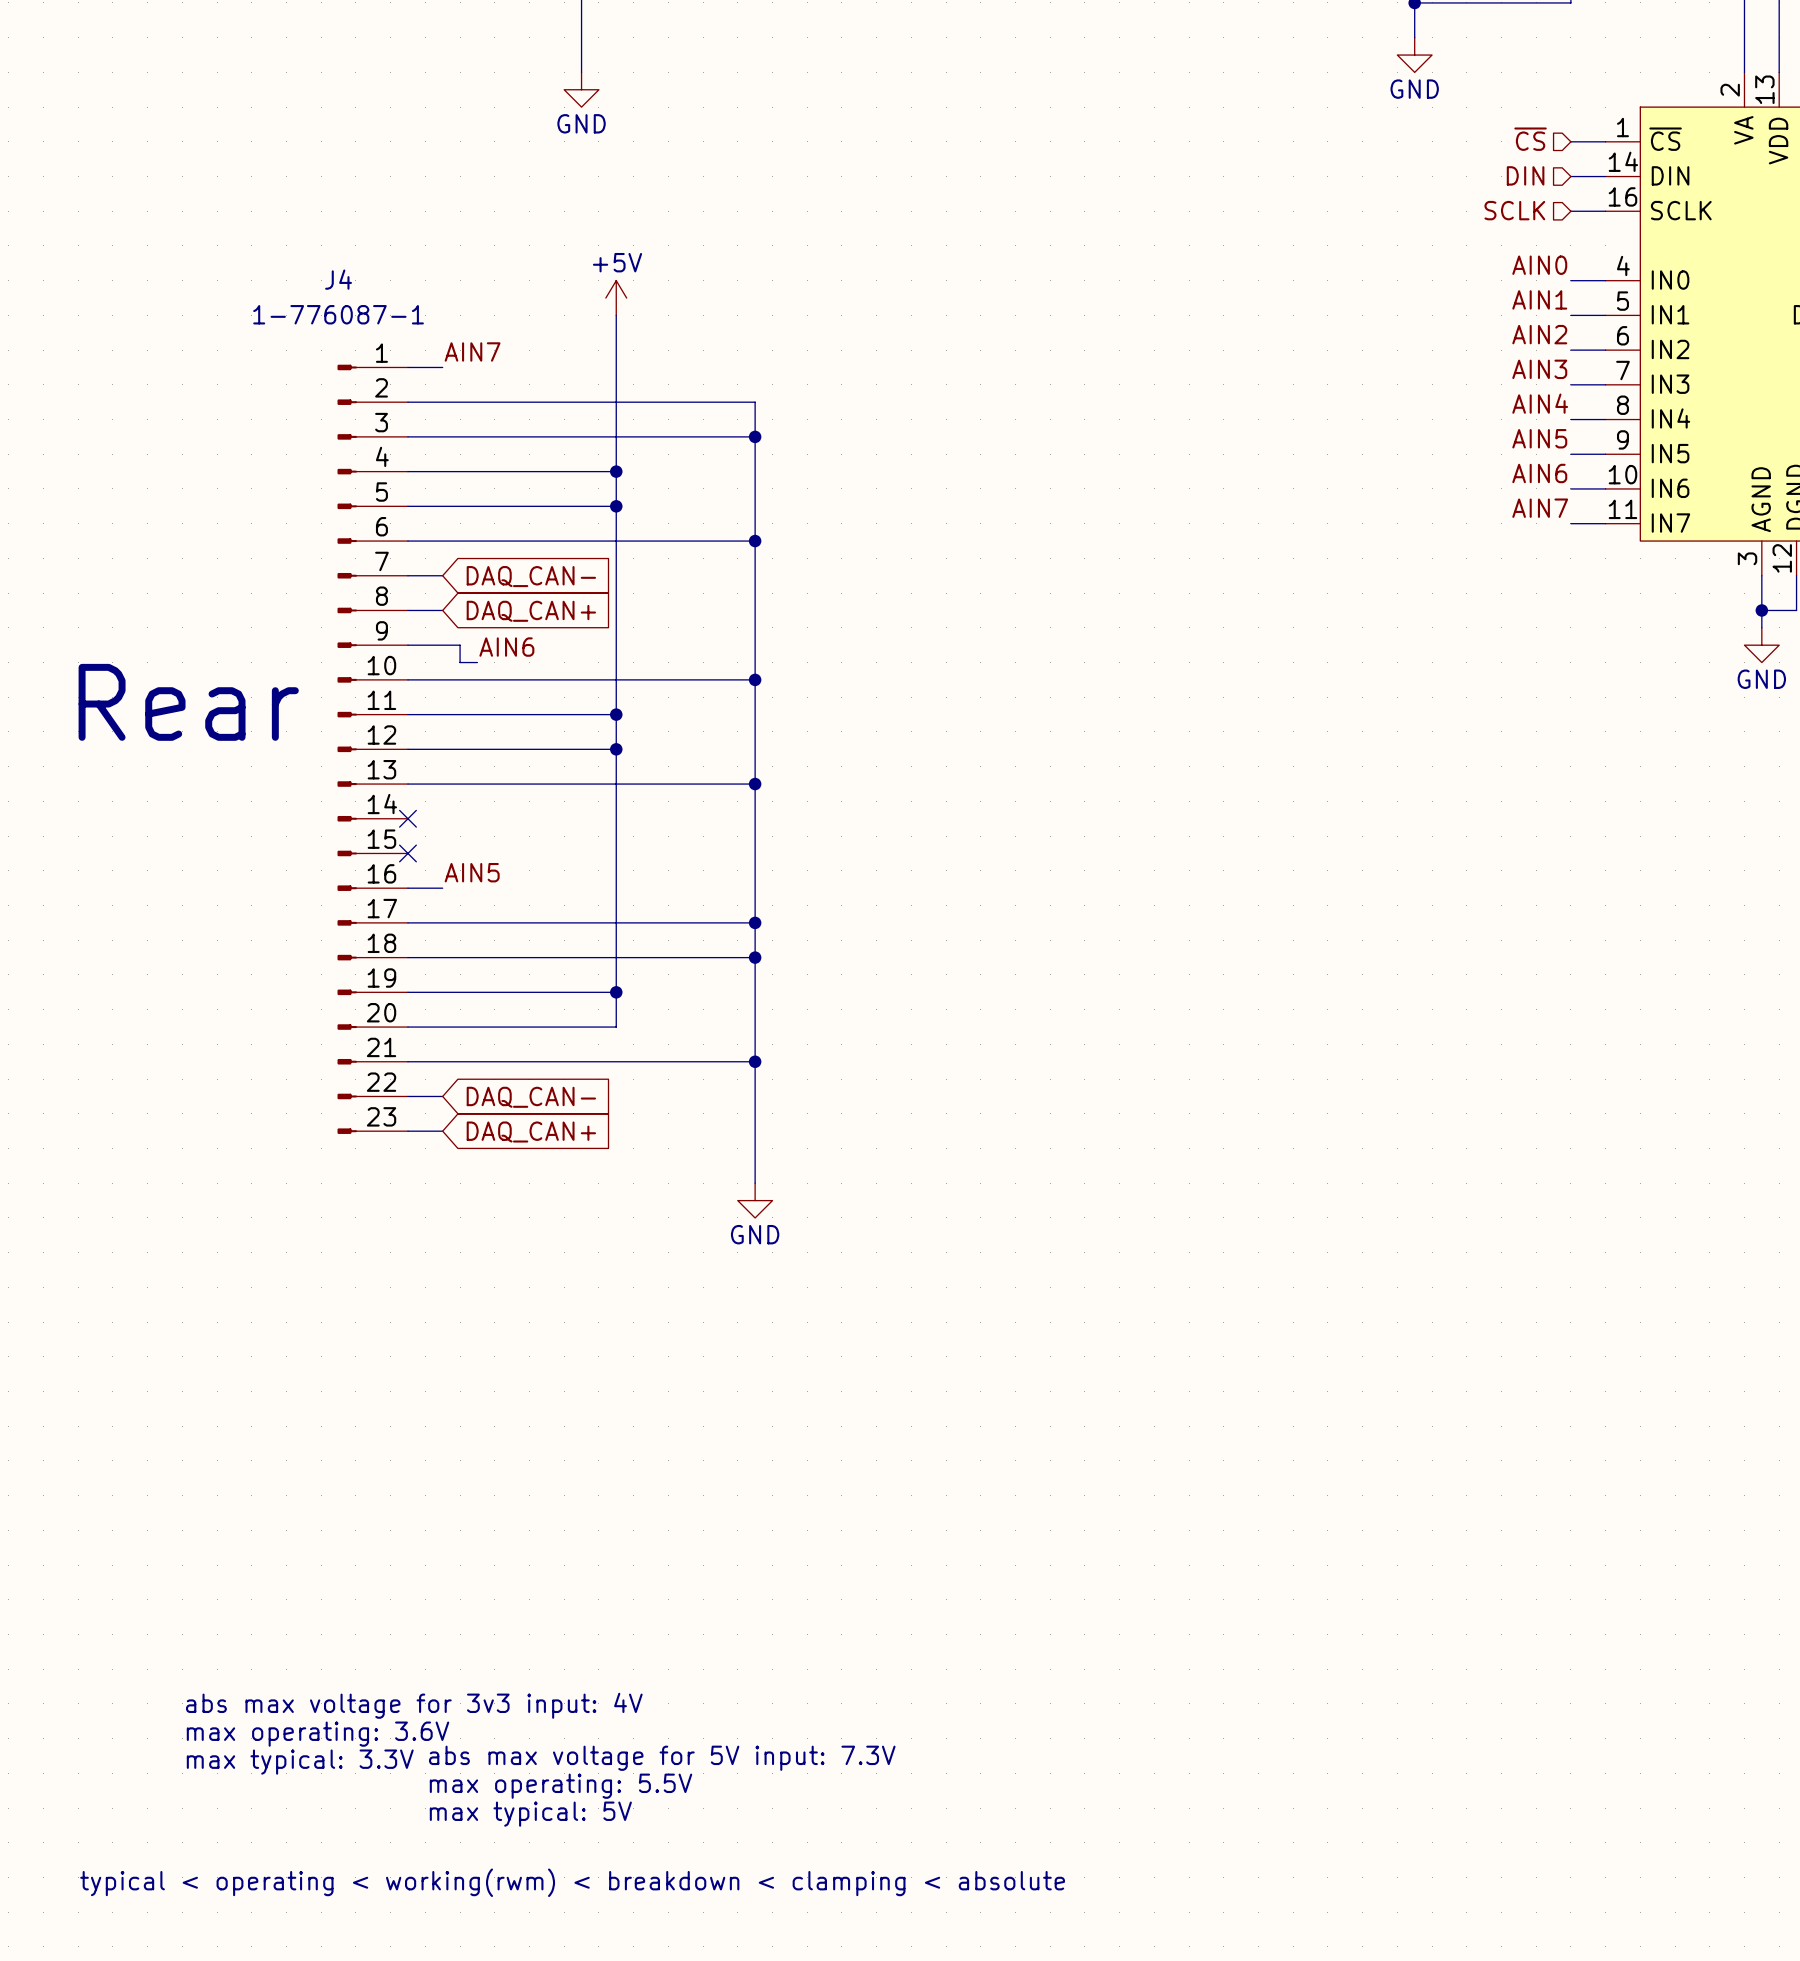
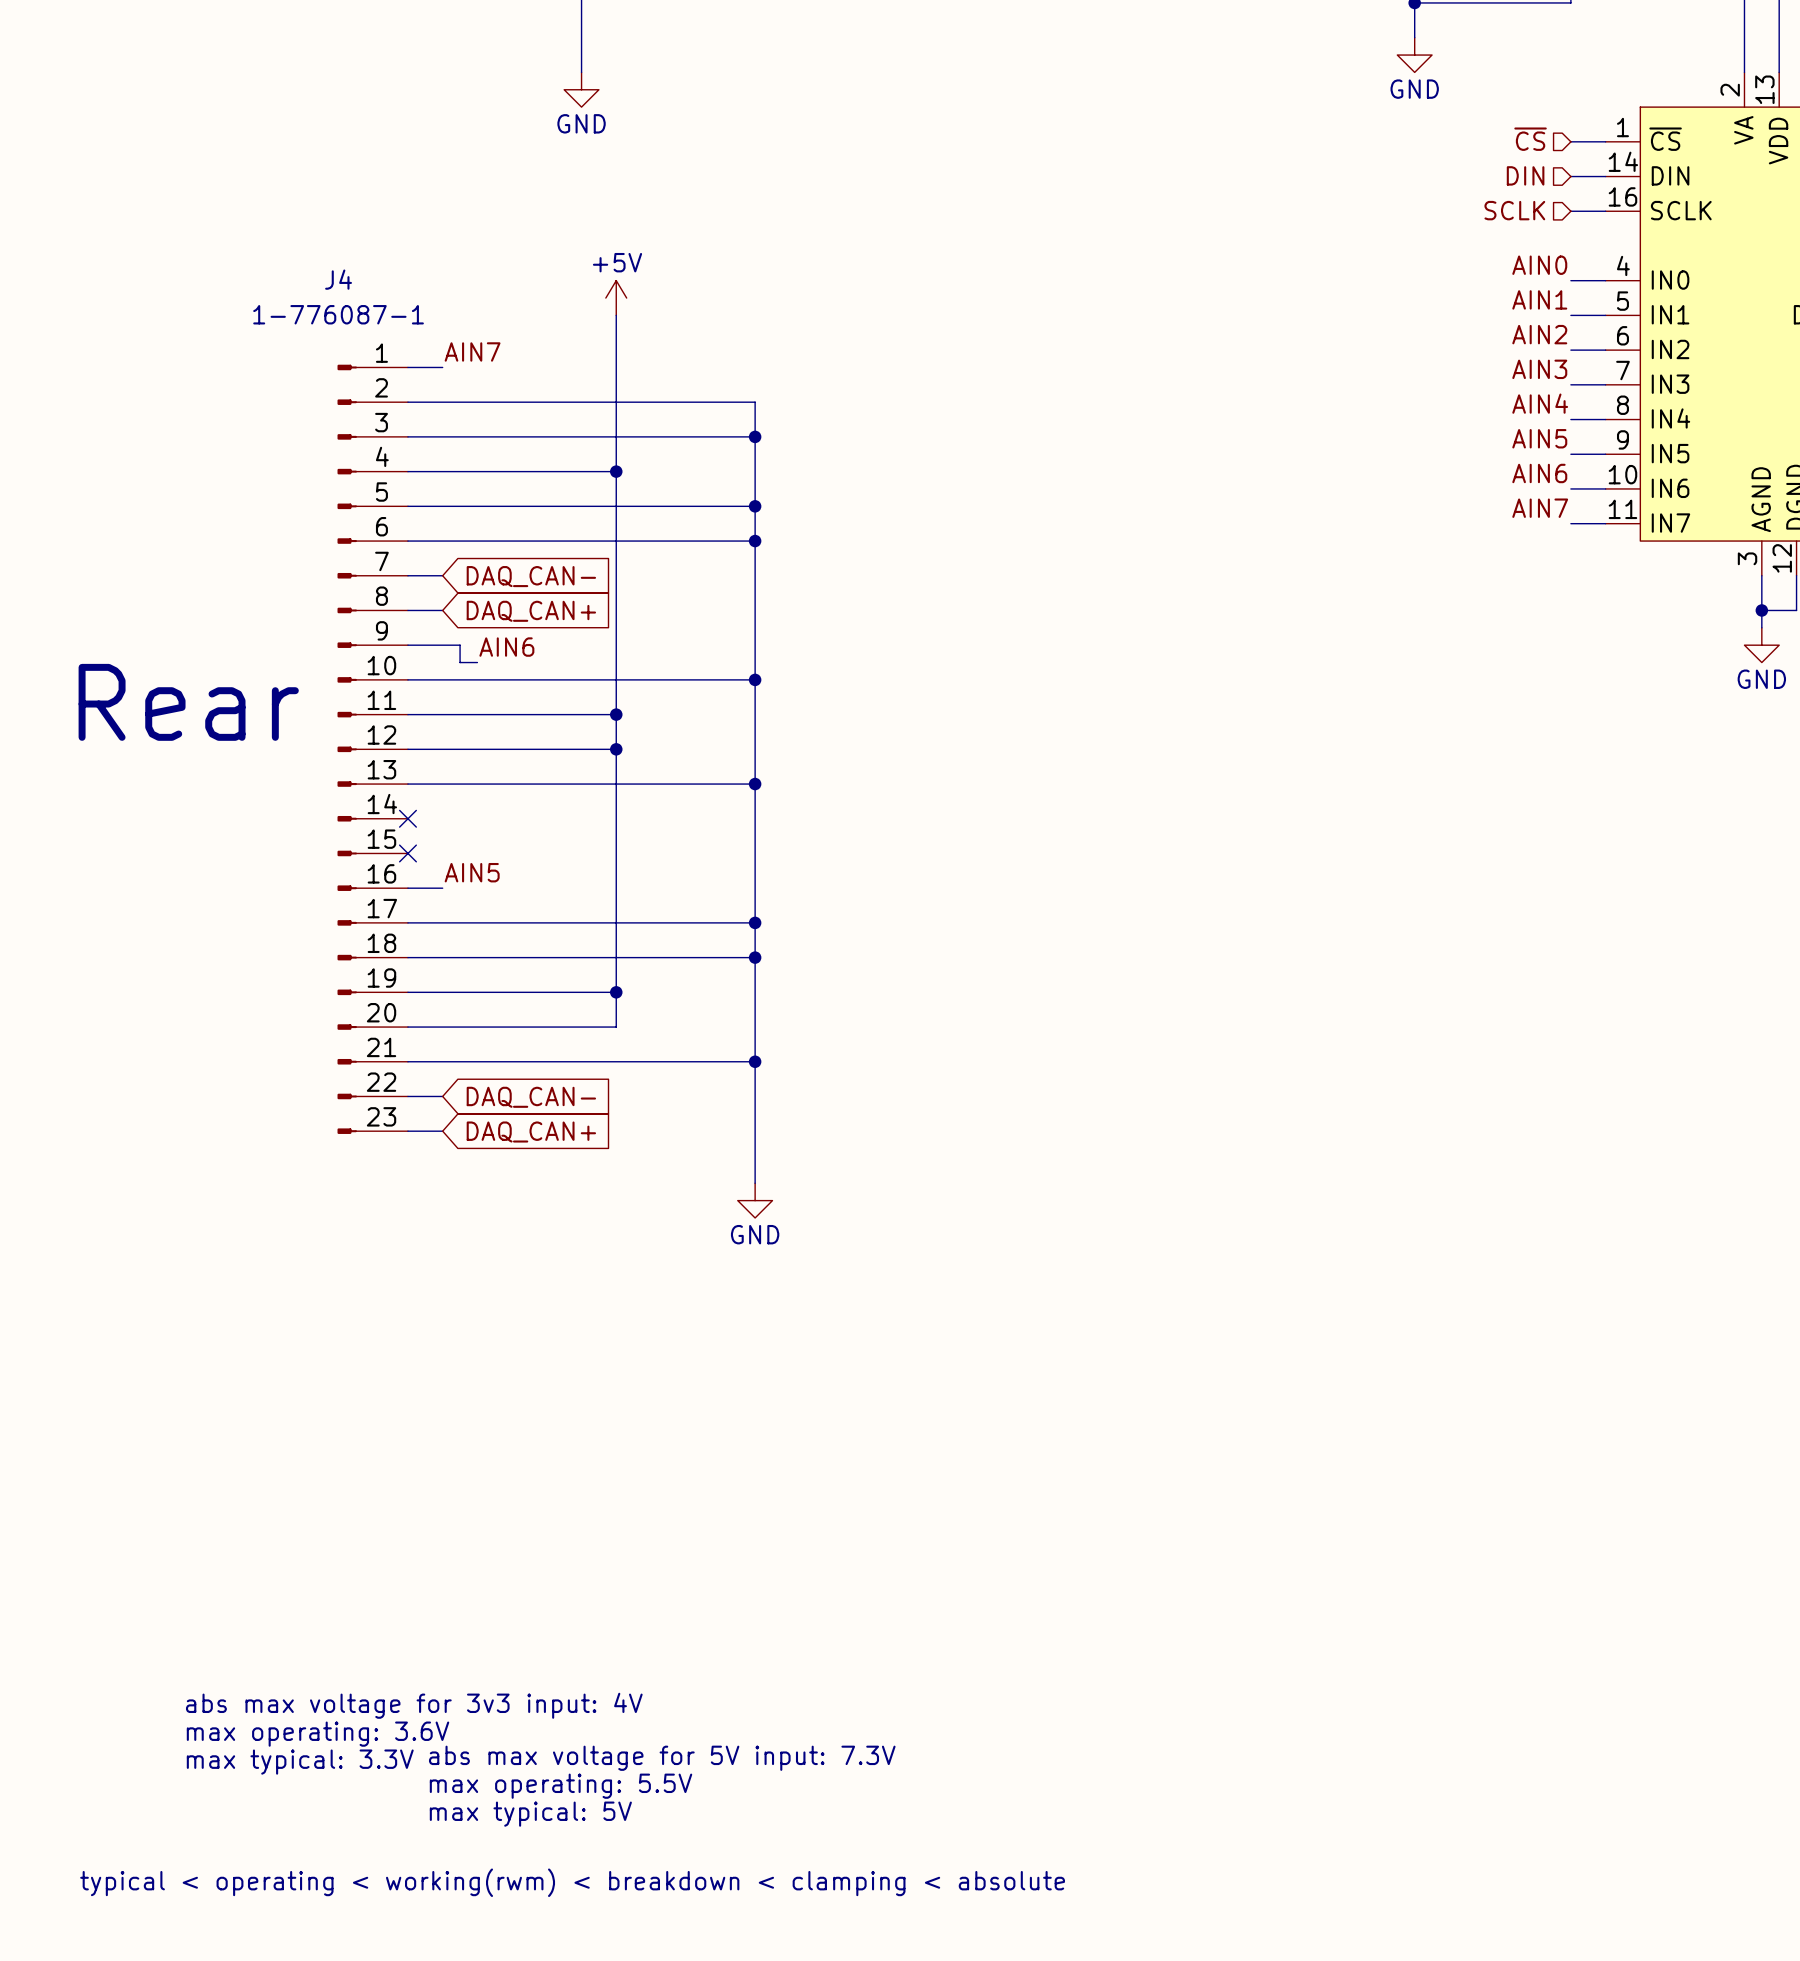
wire: none -> (616, 506) (755, 506)
junction: (616, 506) -> none
junction: none -> (755, 506)

